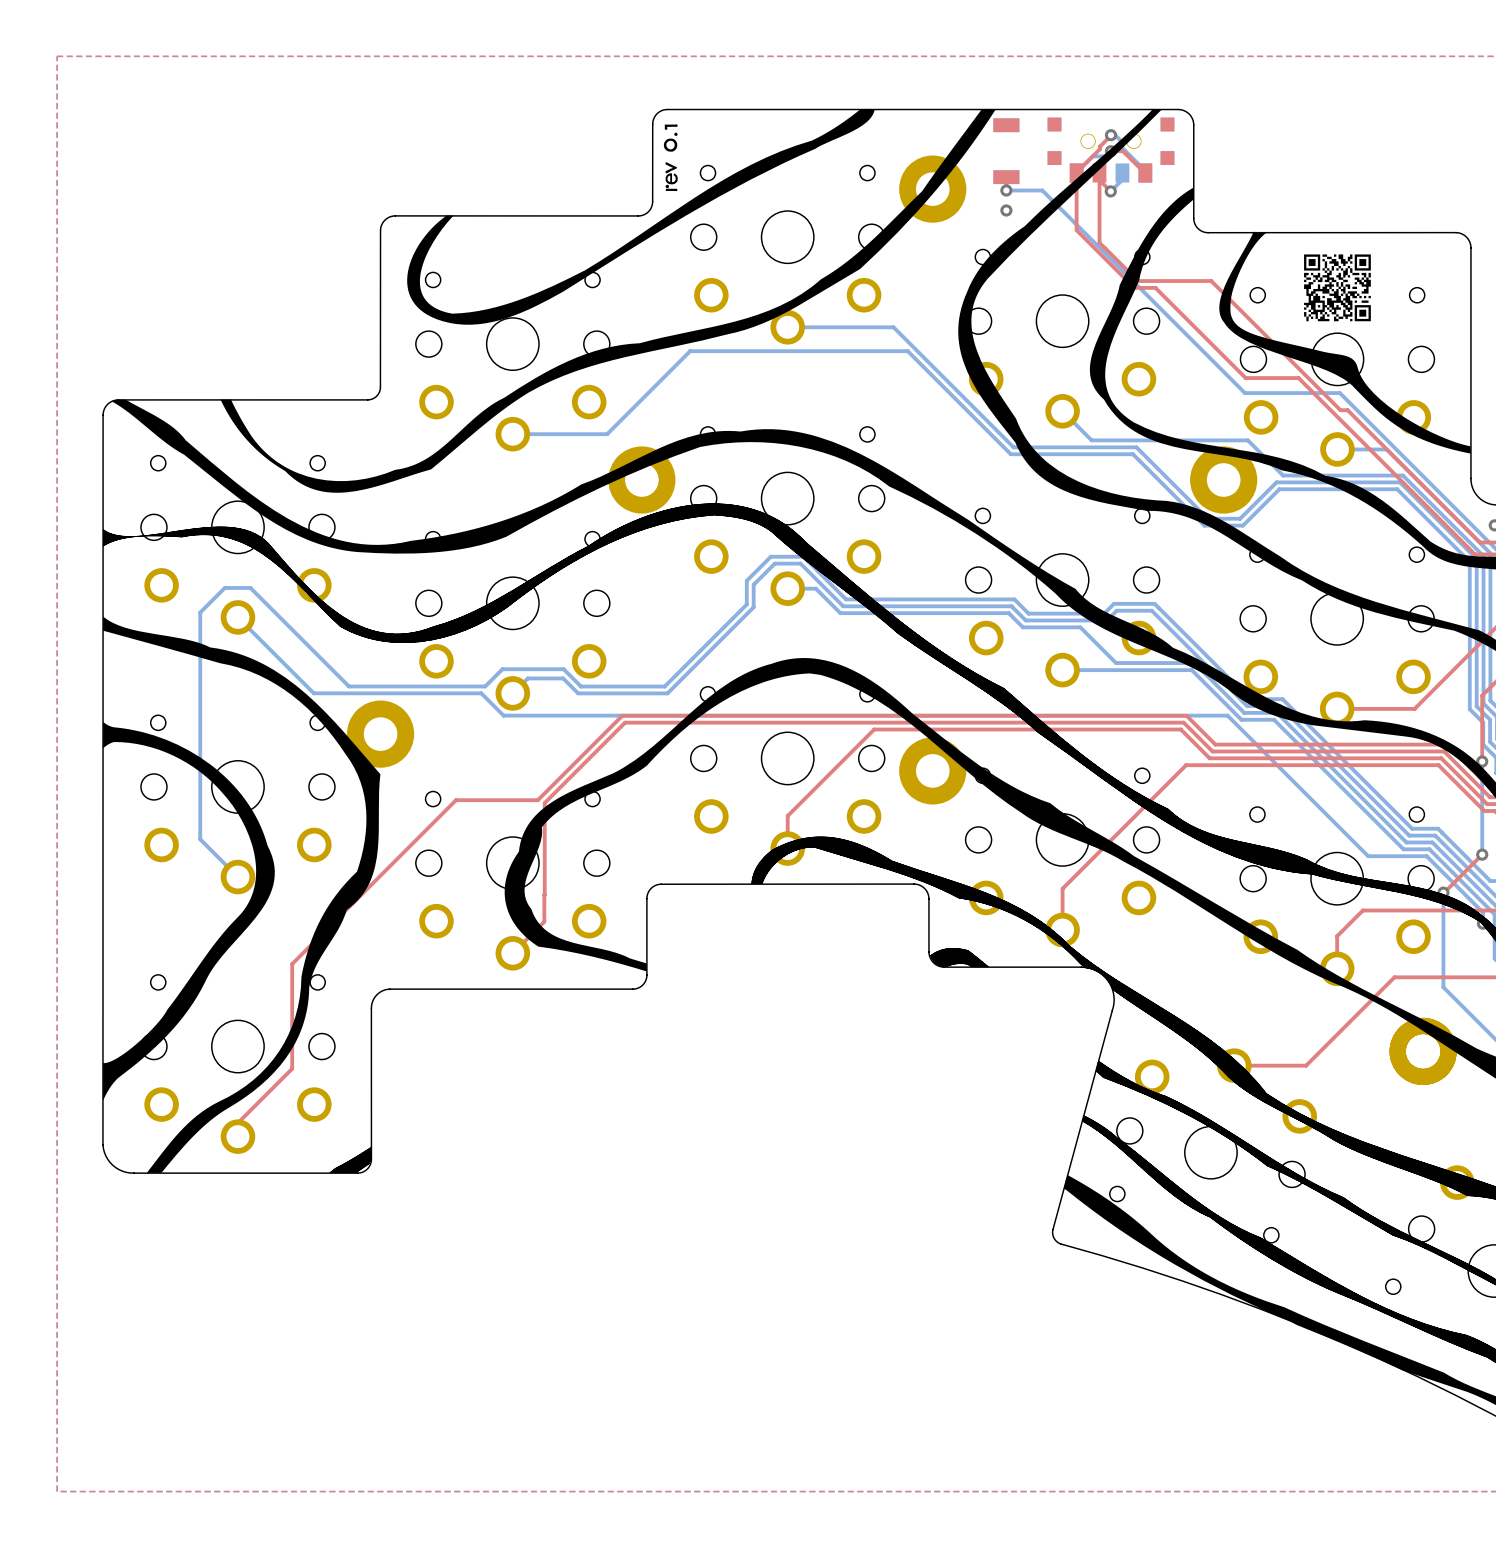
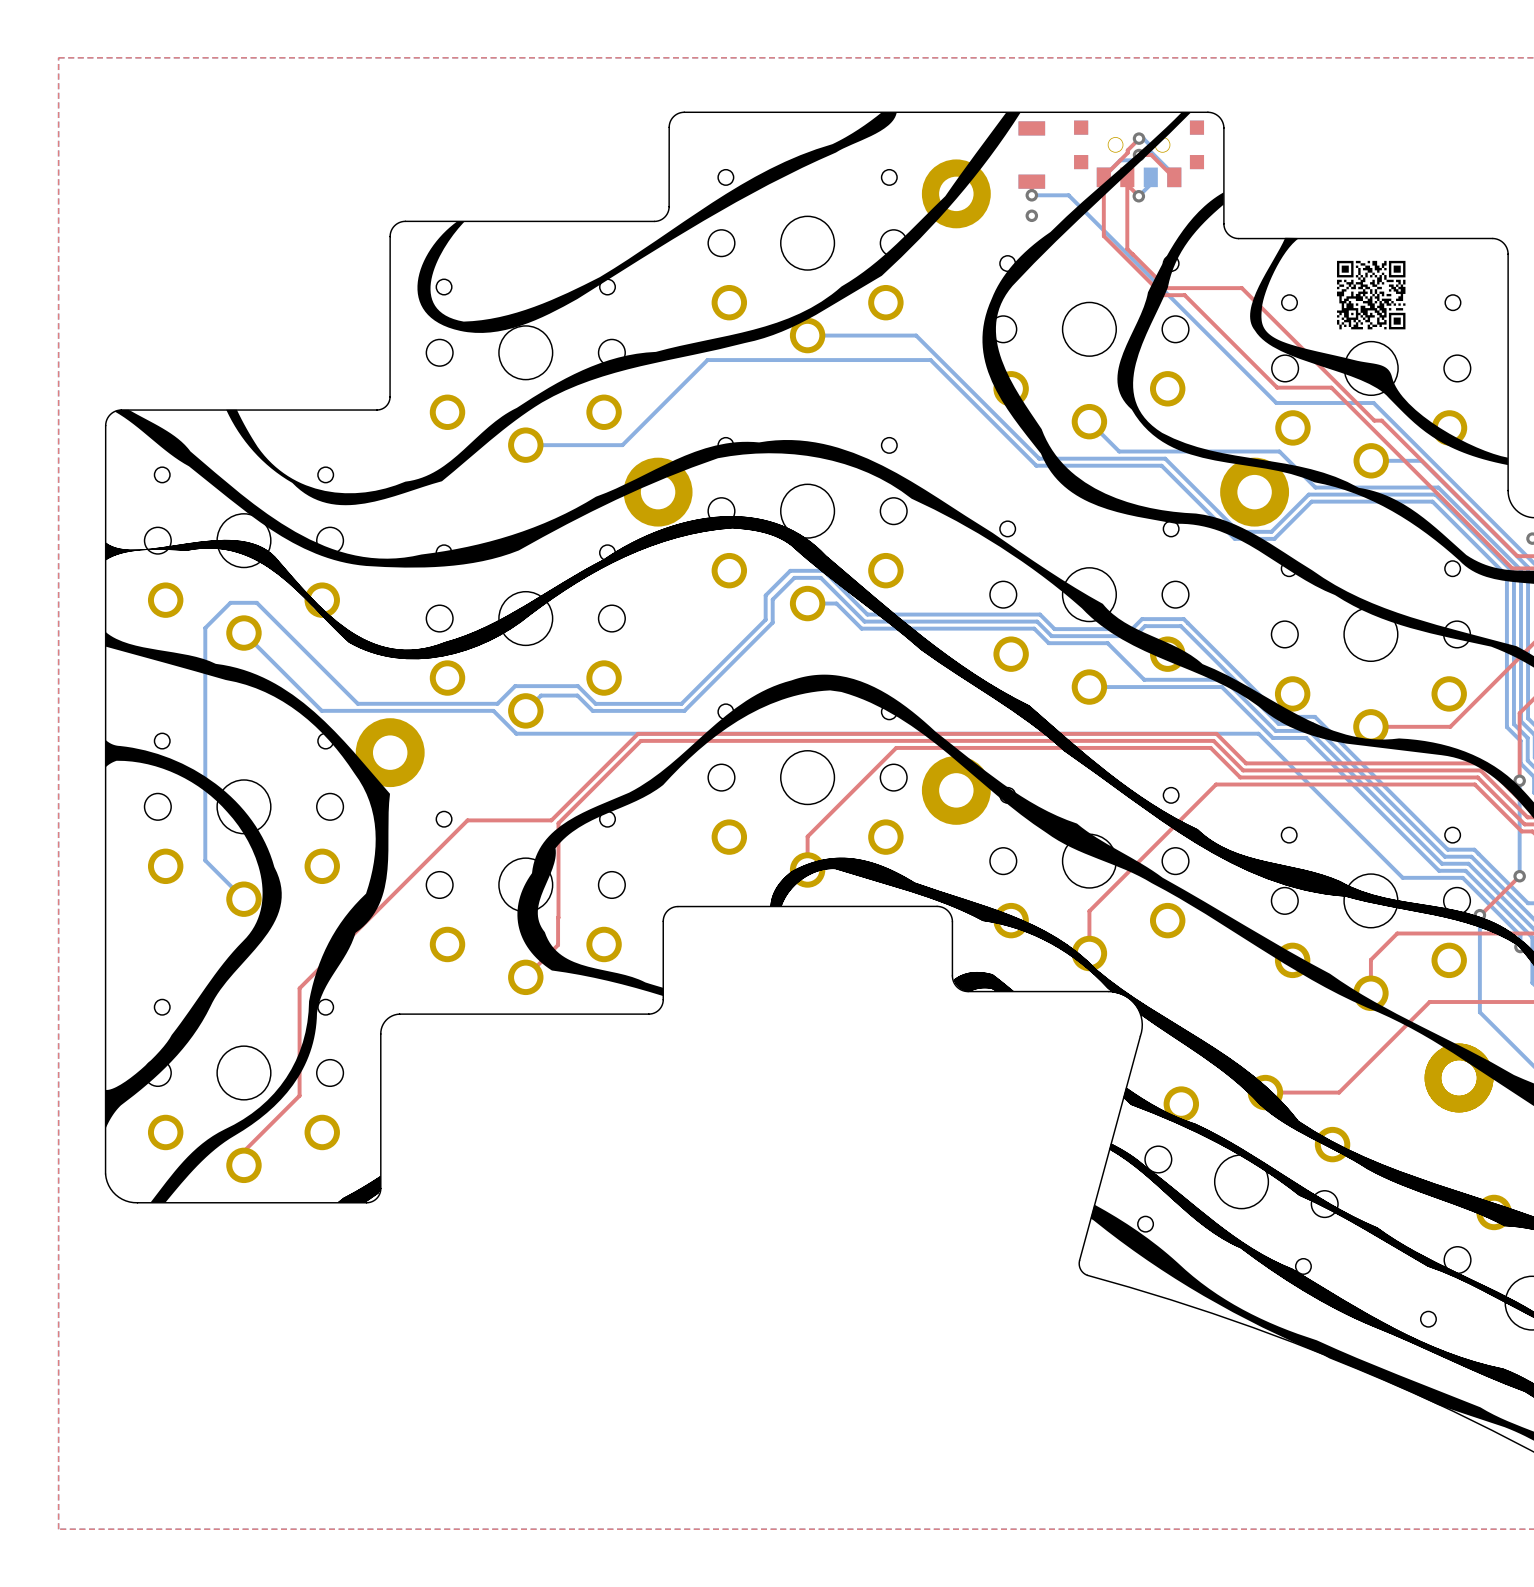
drawing: [663, 124, 678, 192] -> none

